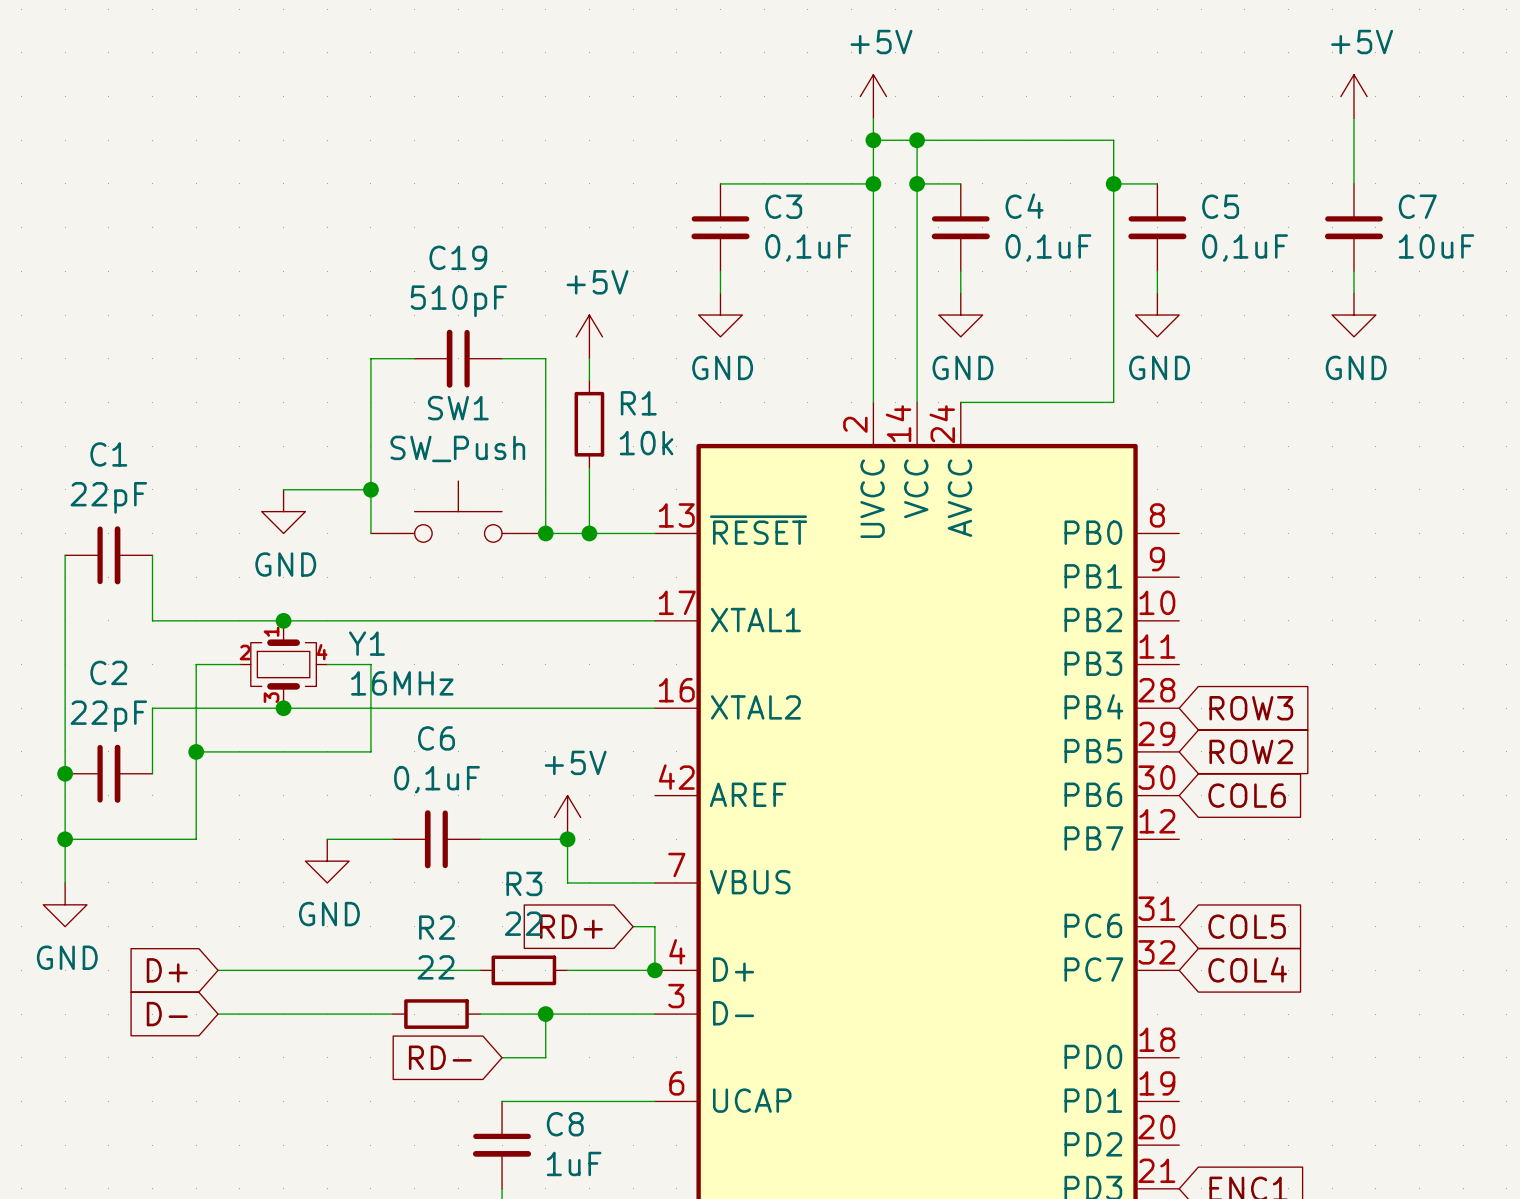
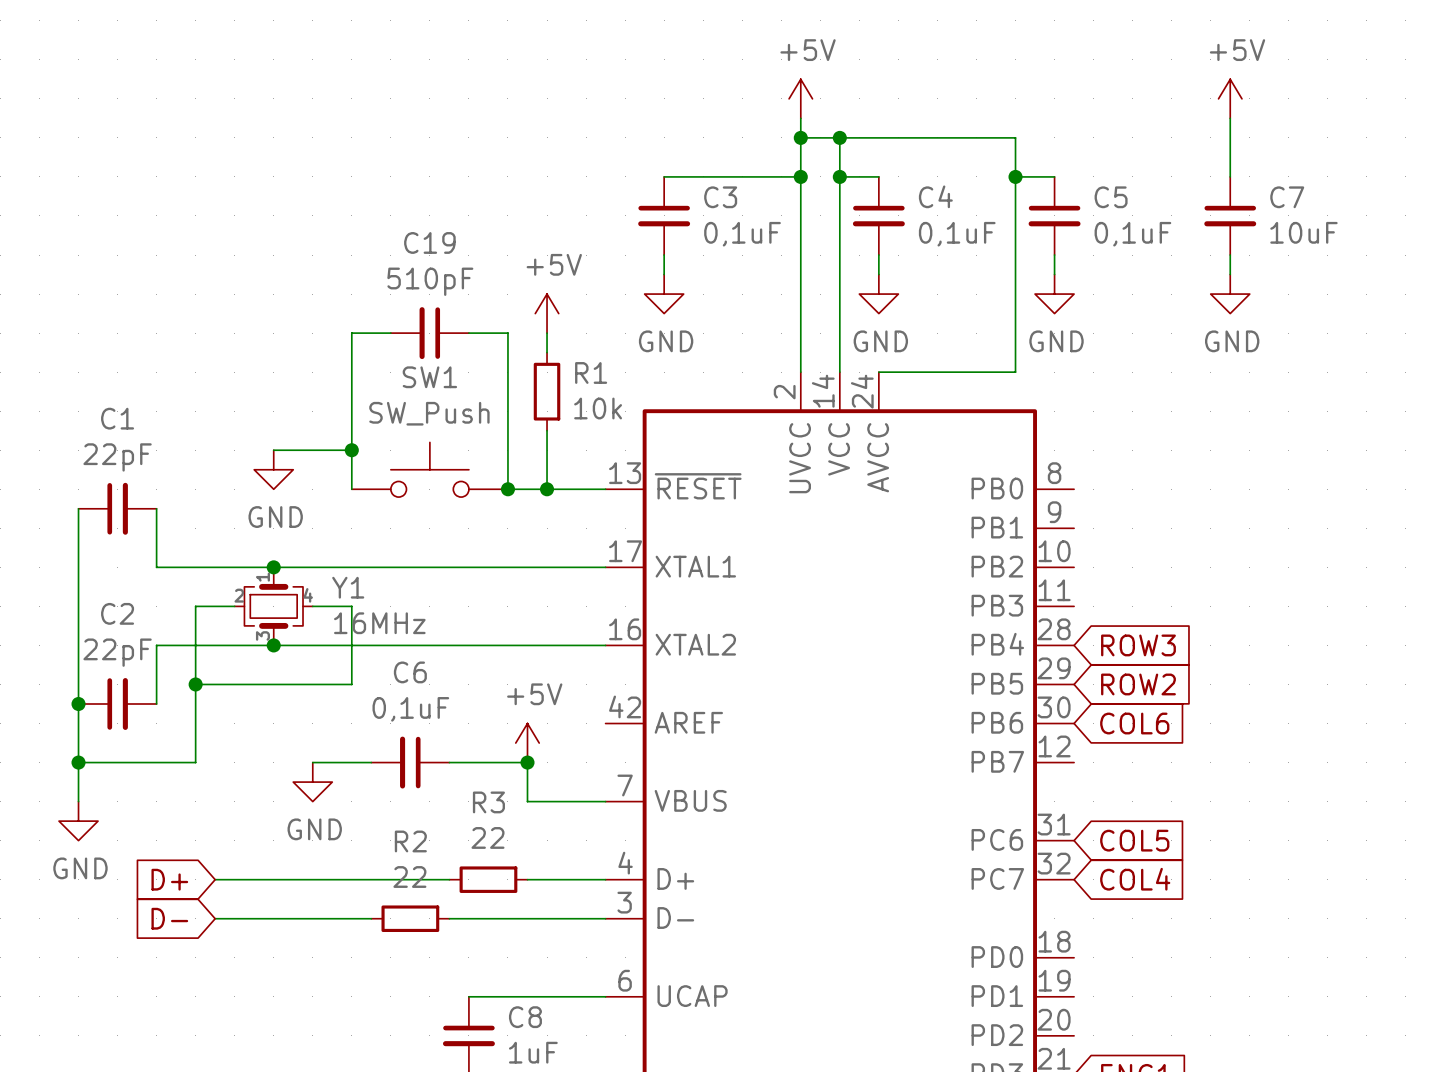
global label: RD+ (571, 926) -> none
wire: (633, 926) (654, 926) (654, 970) -> none
junction: (654, 970) -> none
wire: (545, 1014) (545, 1057) (502, 1057) -> none
junction: (545, 1014) -> none
global label: RD- (440, 1057) -> none

